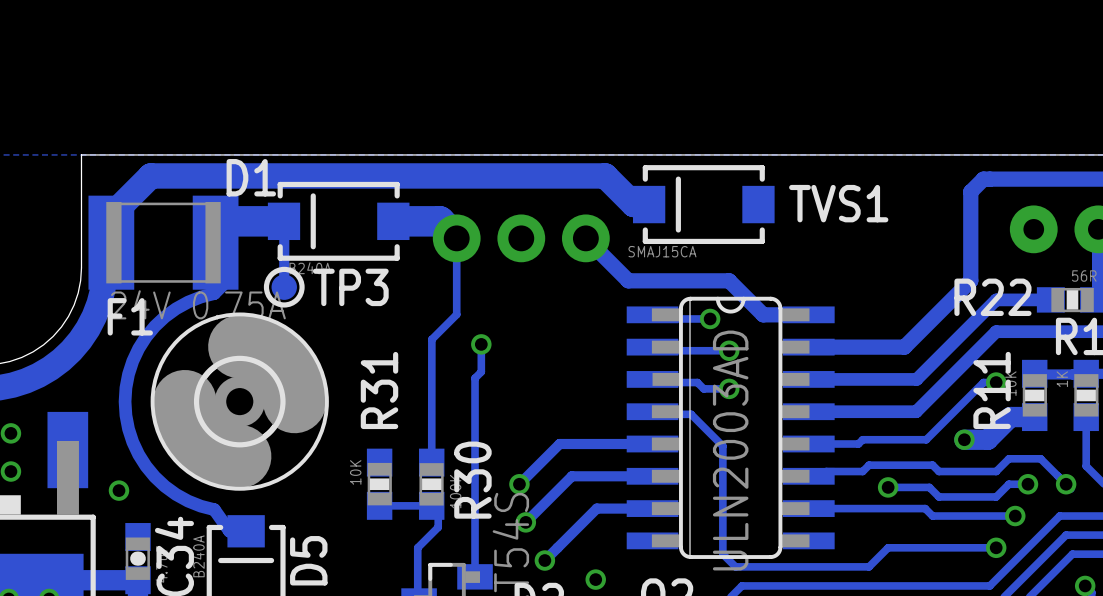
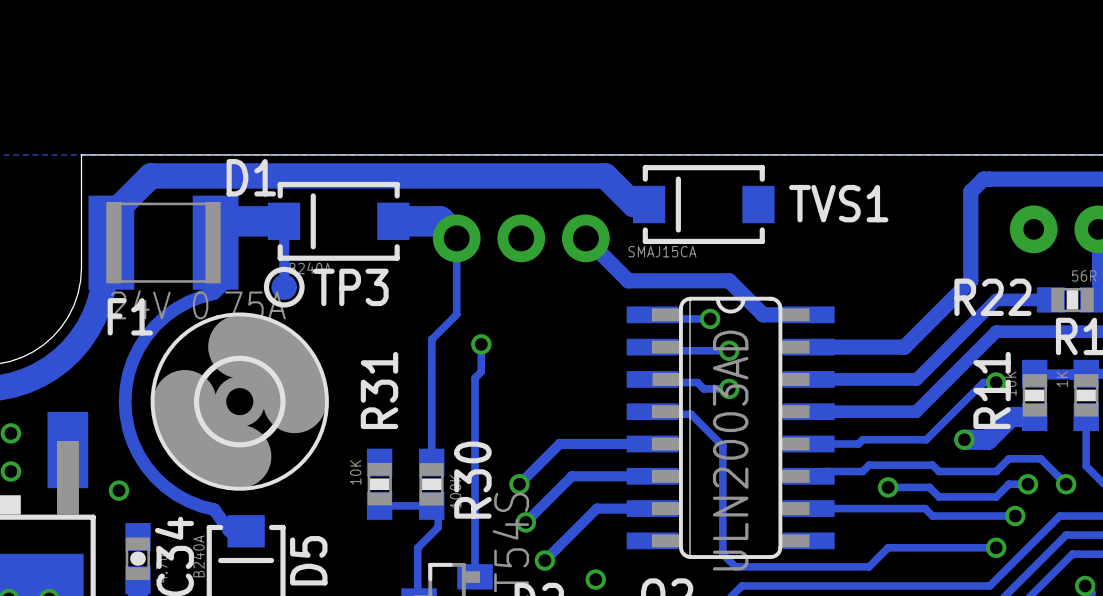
track: (138, 580) (62, 580) -> none

